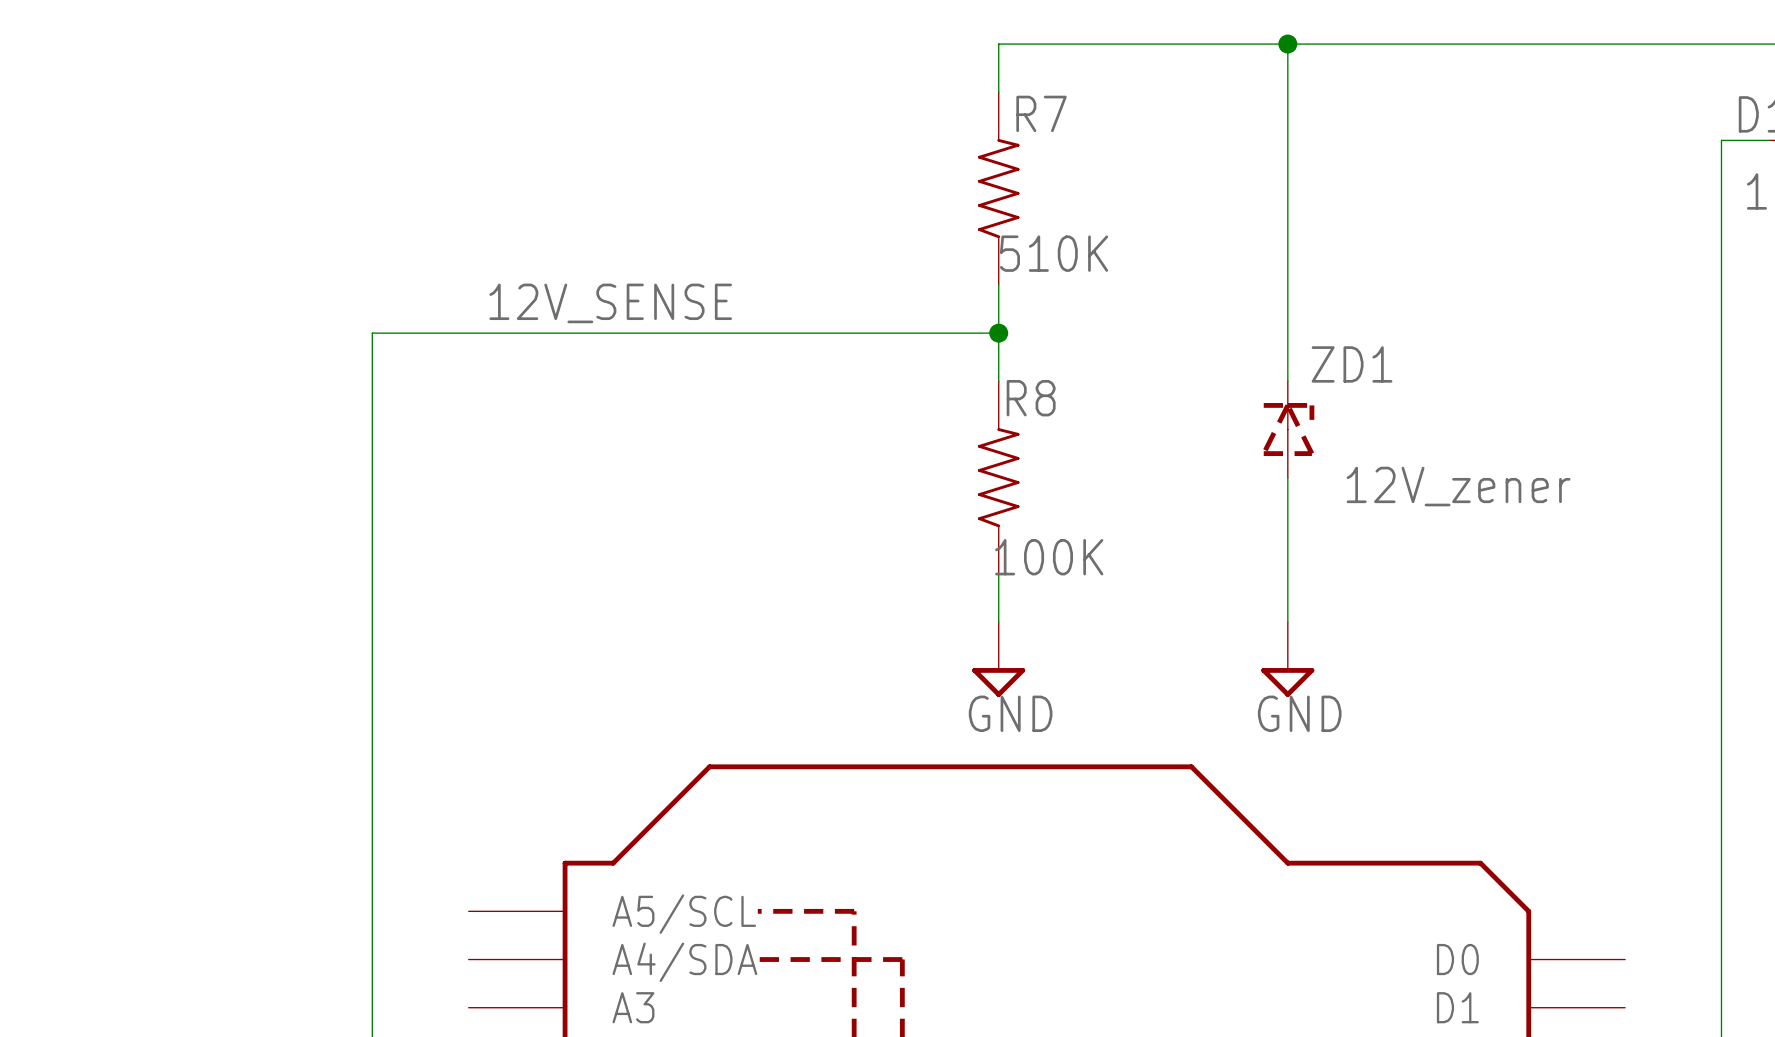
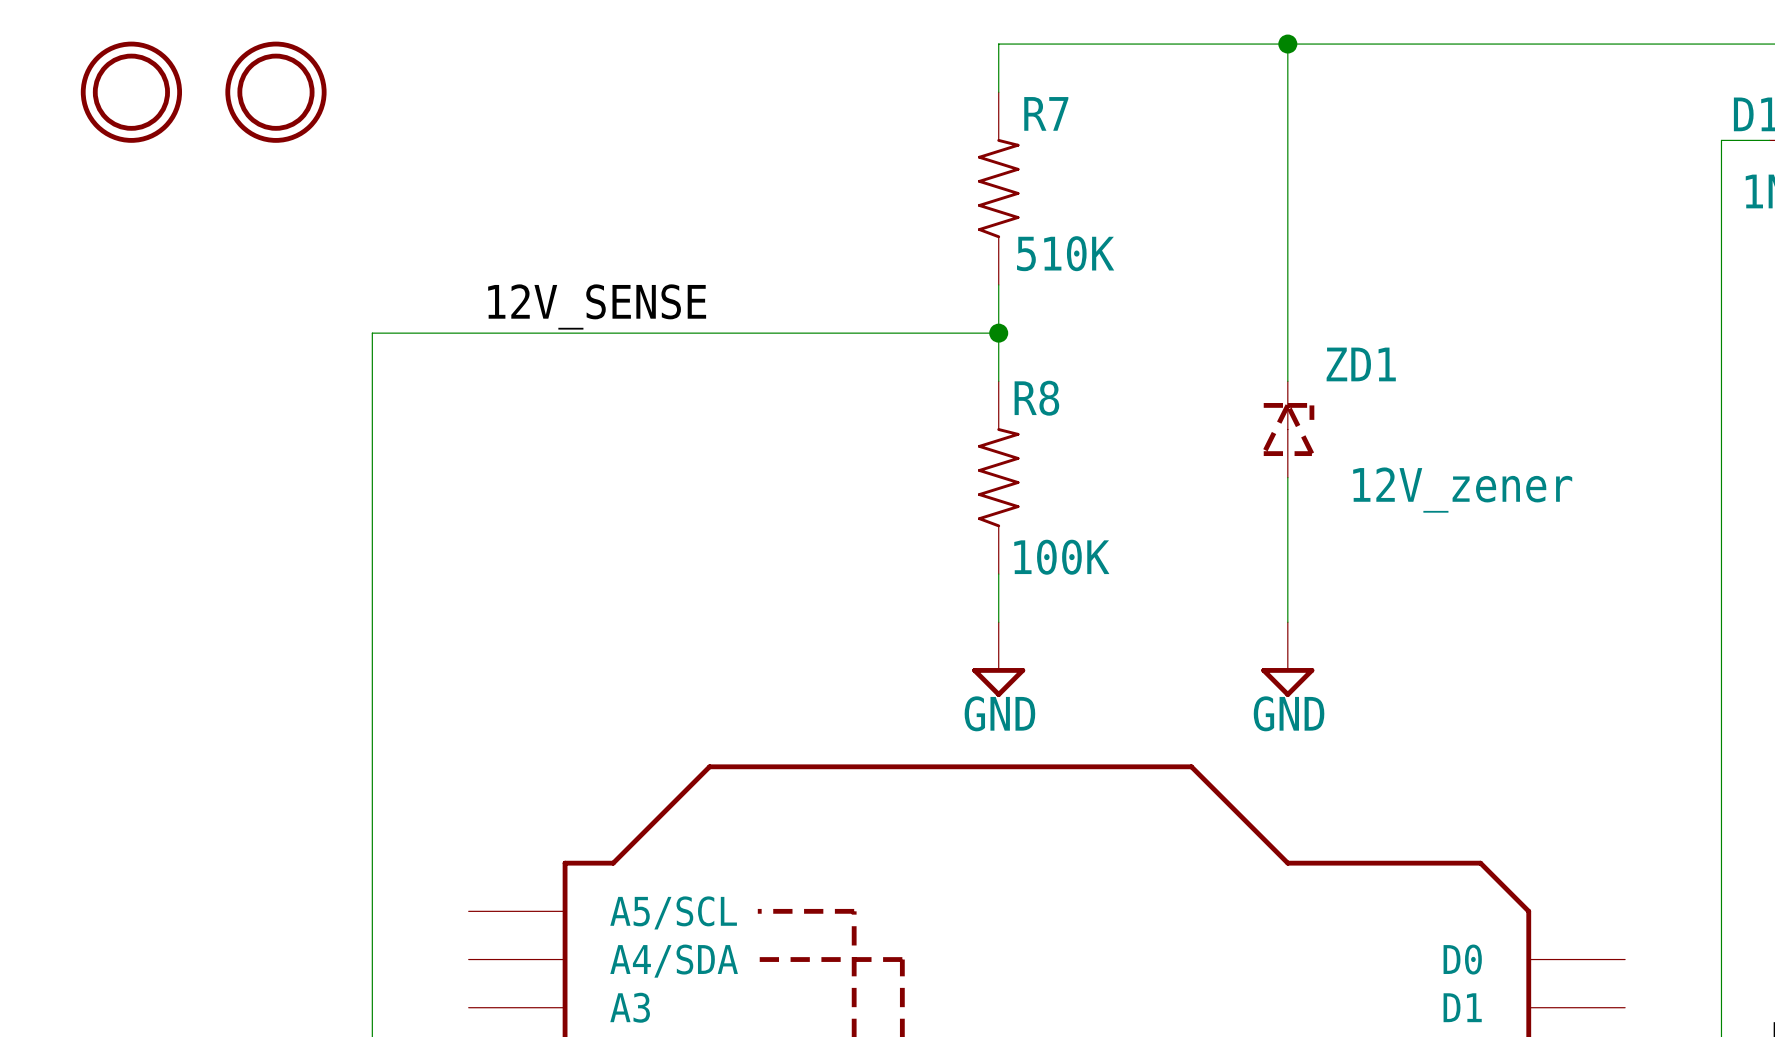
part: none -> (131, 92)
part: none -> (275, 92)

